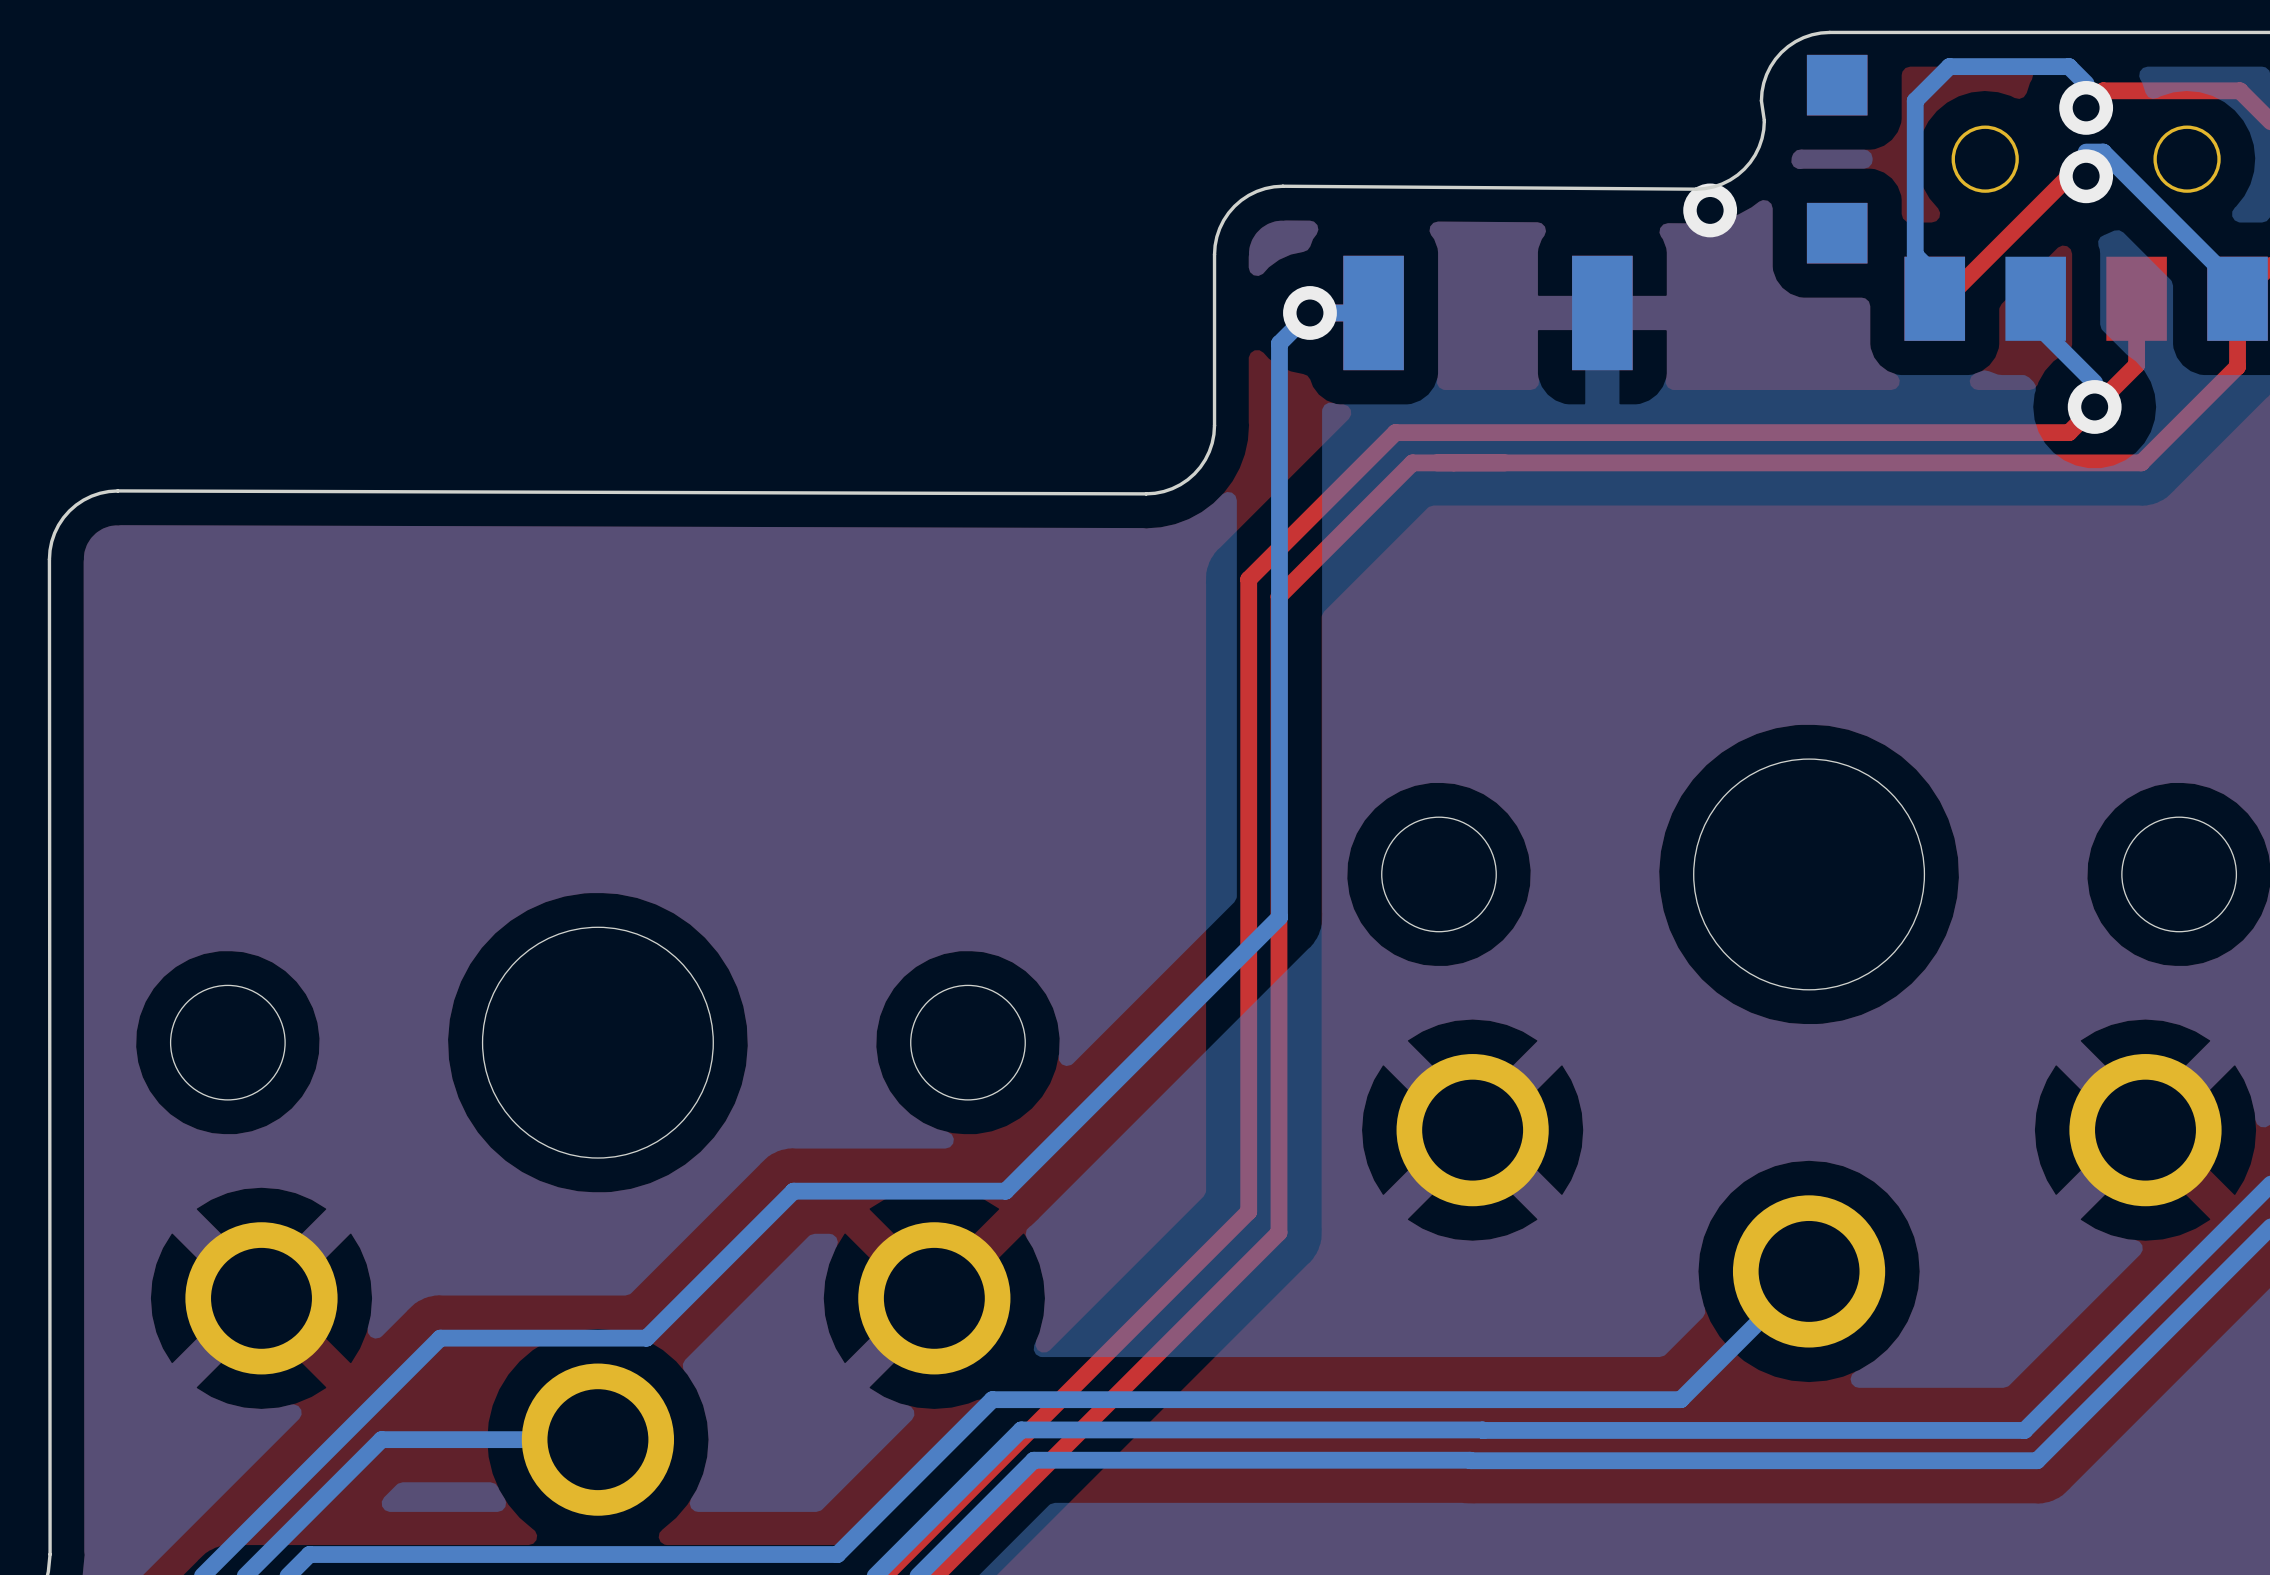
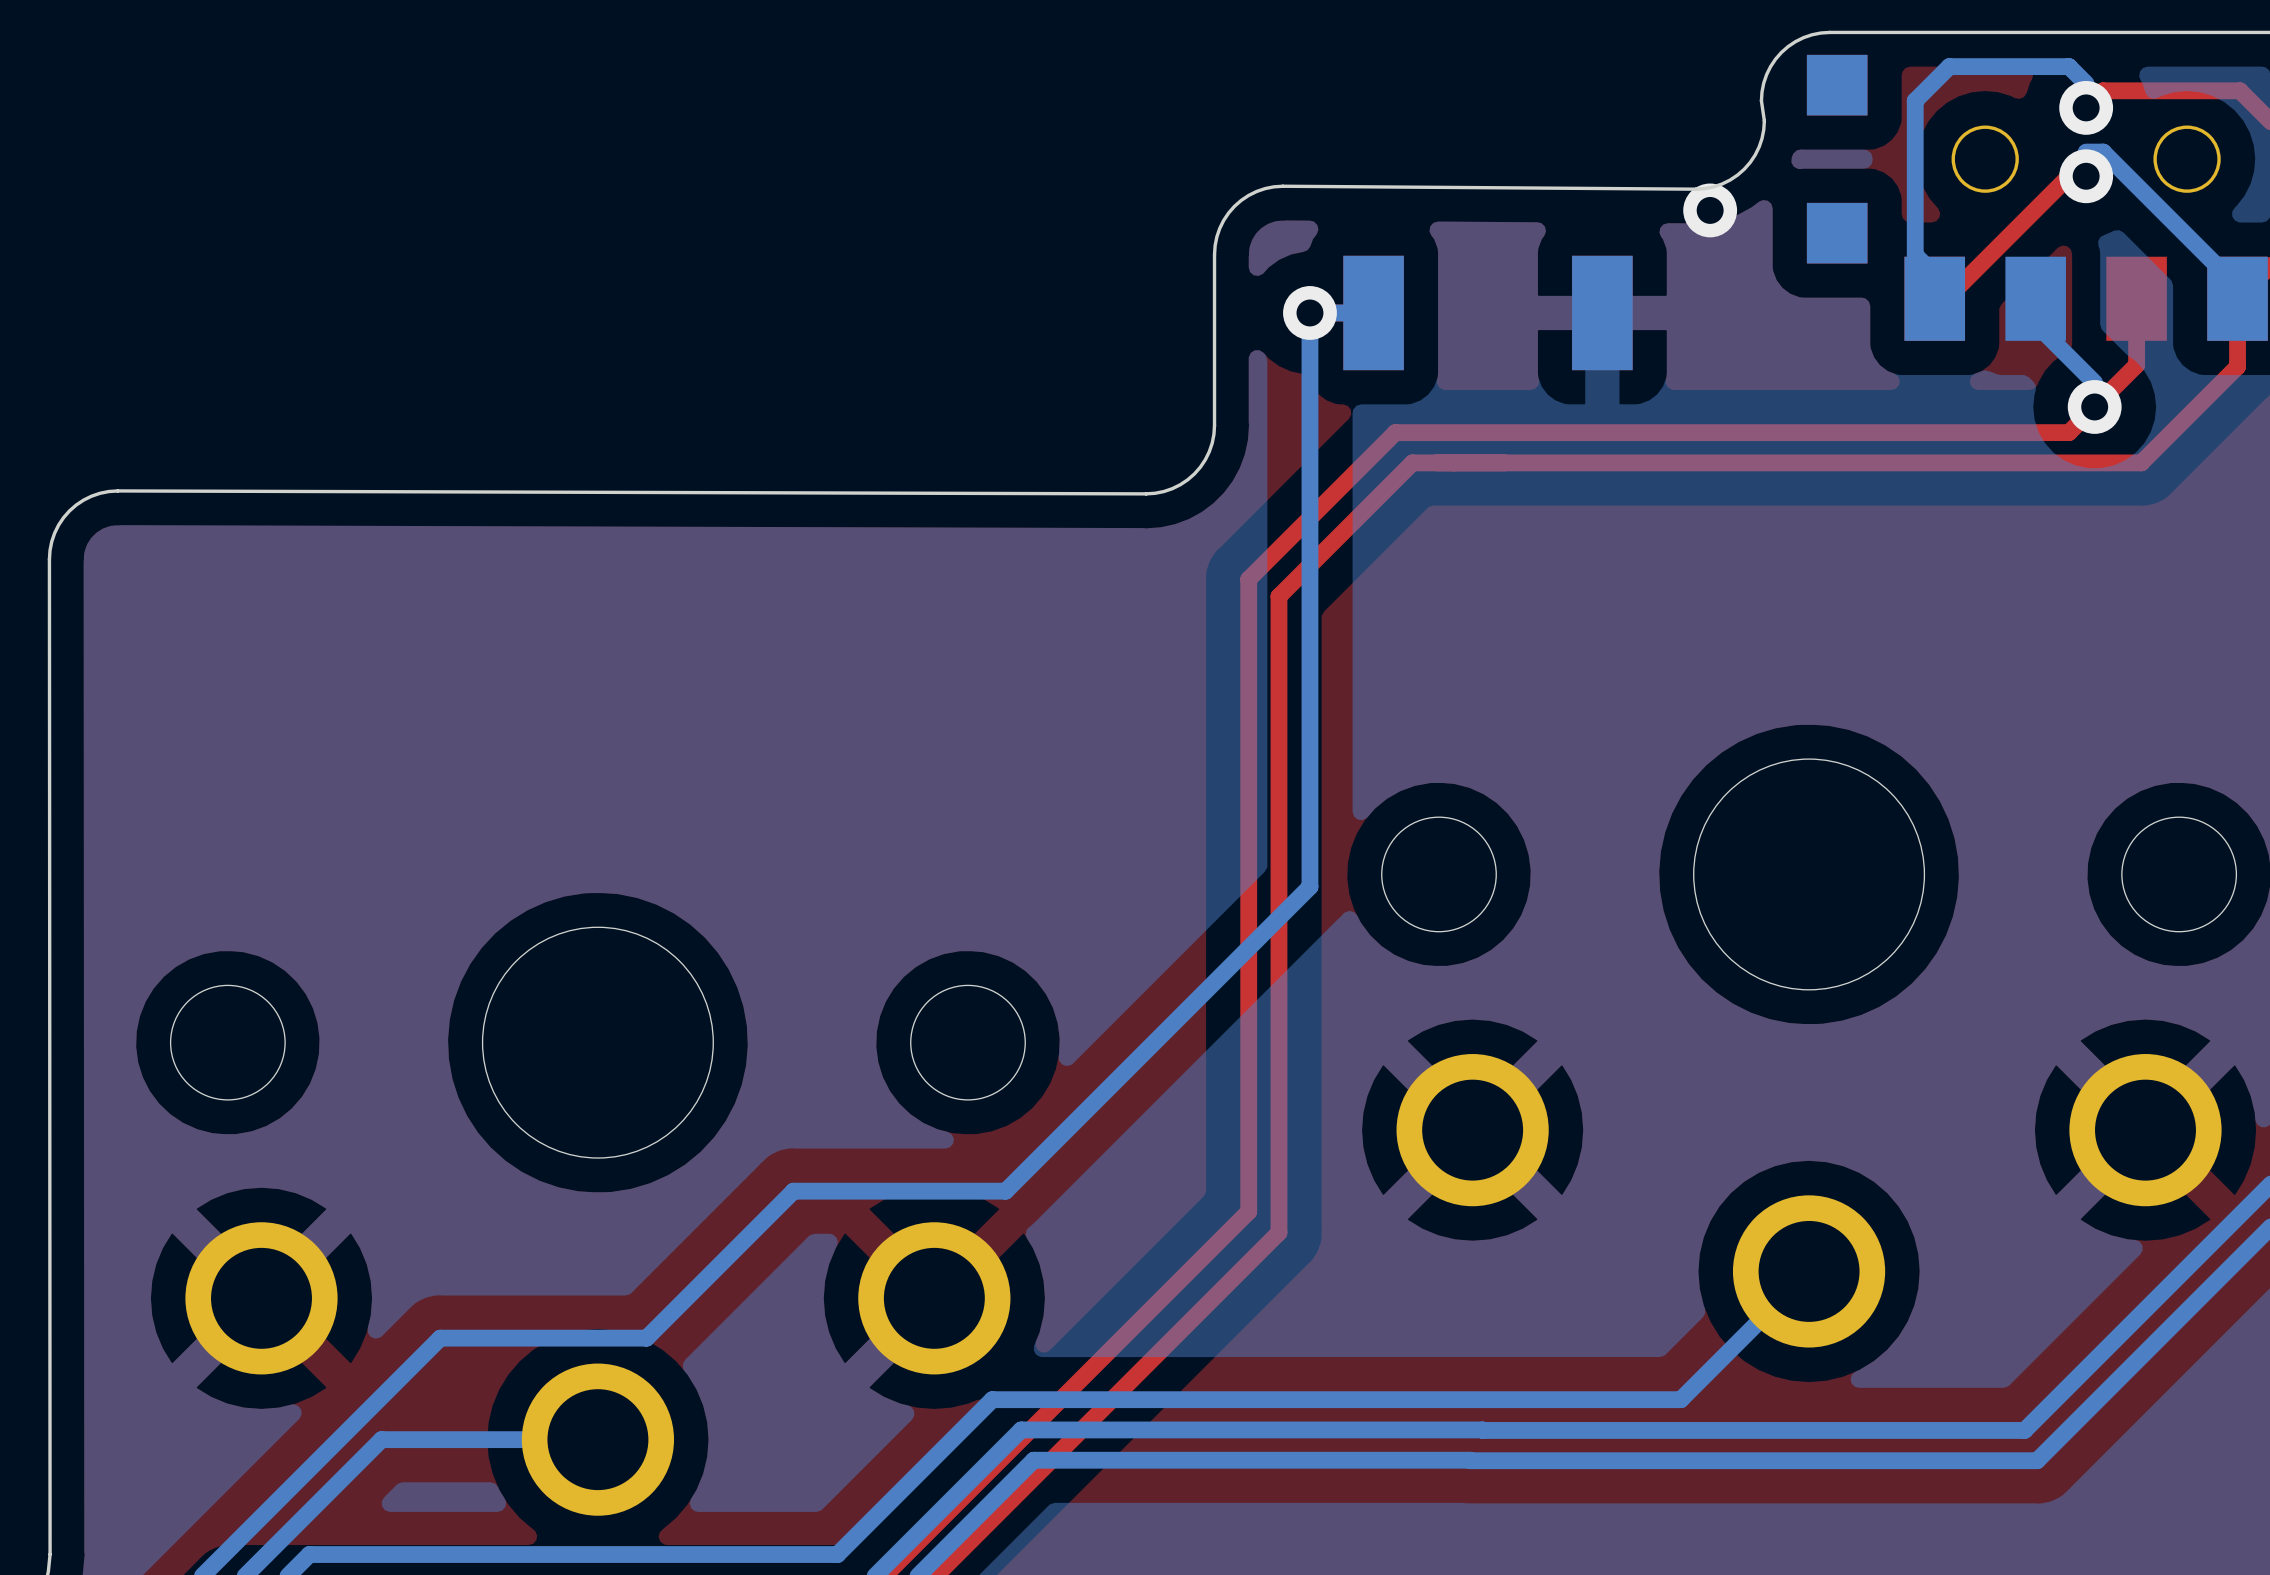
bottom track: (1309, 312) (1279, 343) (1279, 917) -> (1317, 320) (1309, 312) (1309, 886) (1279, 917)

